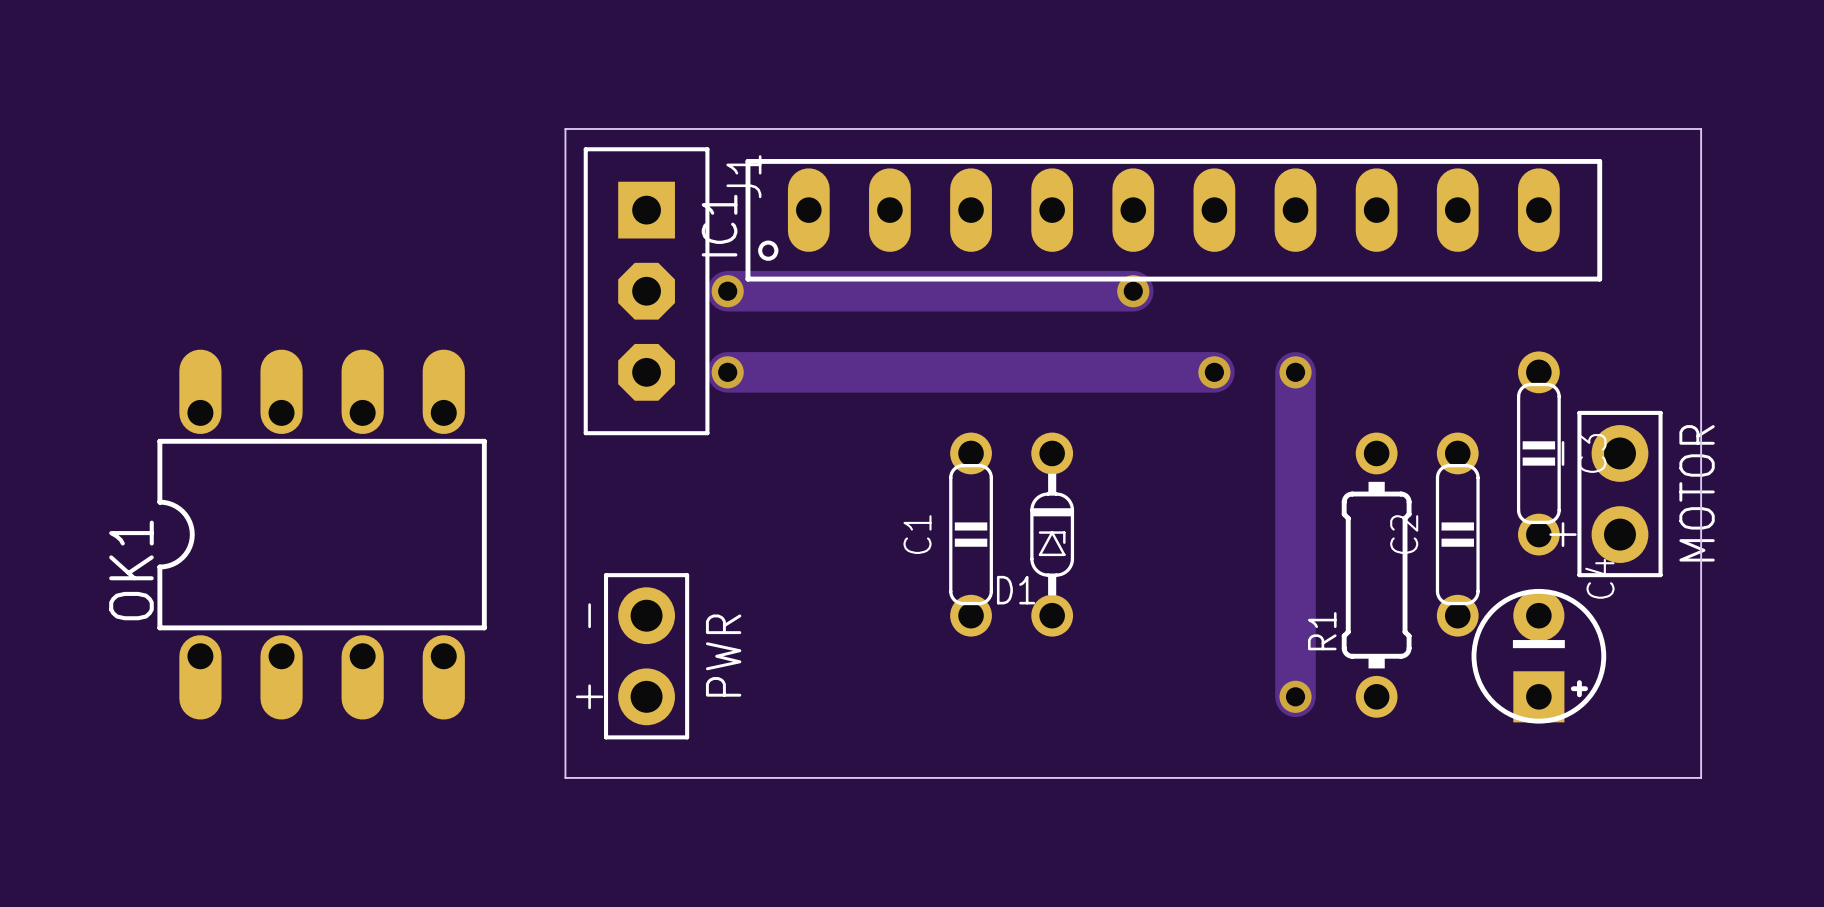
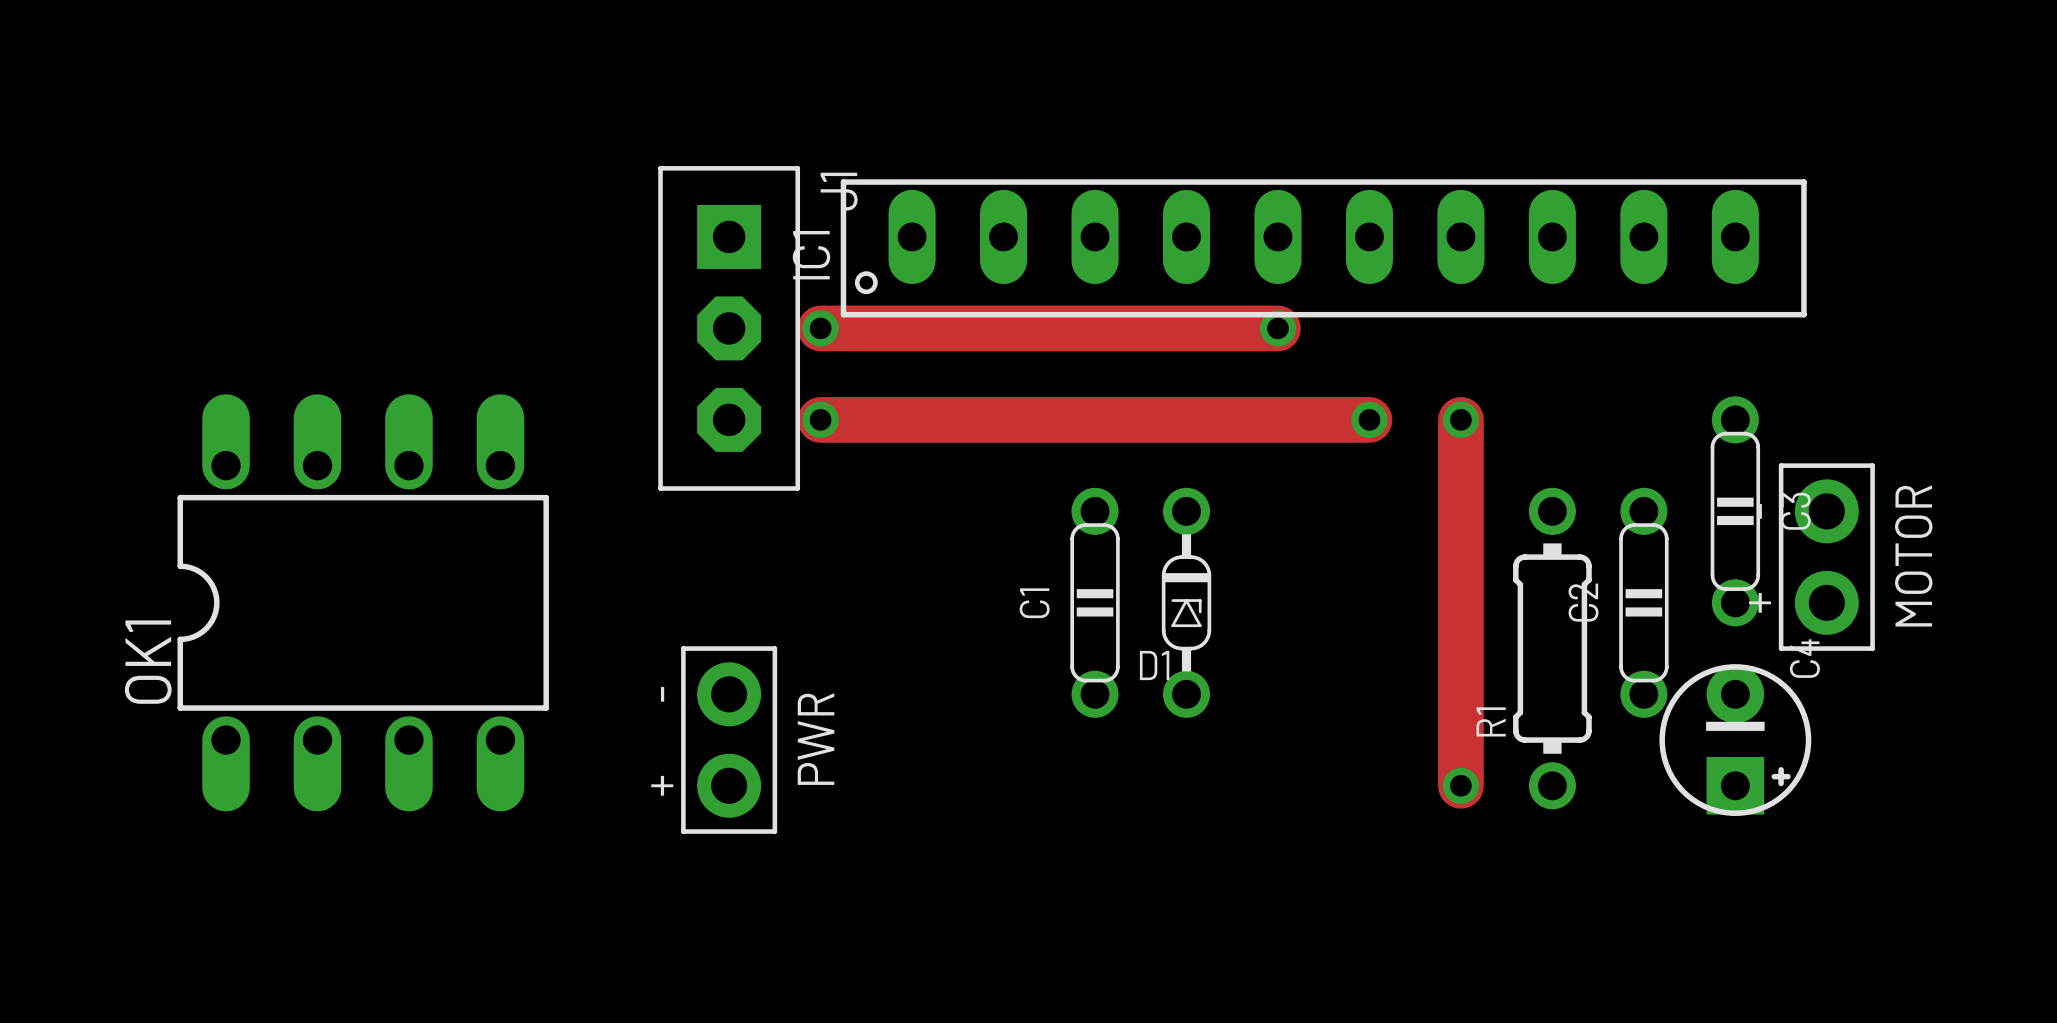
board edge: (565, 128) (1701, 128) (1701, 777) (565, 777) (565, 128) -> none

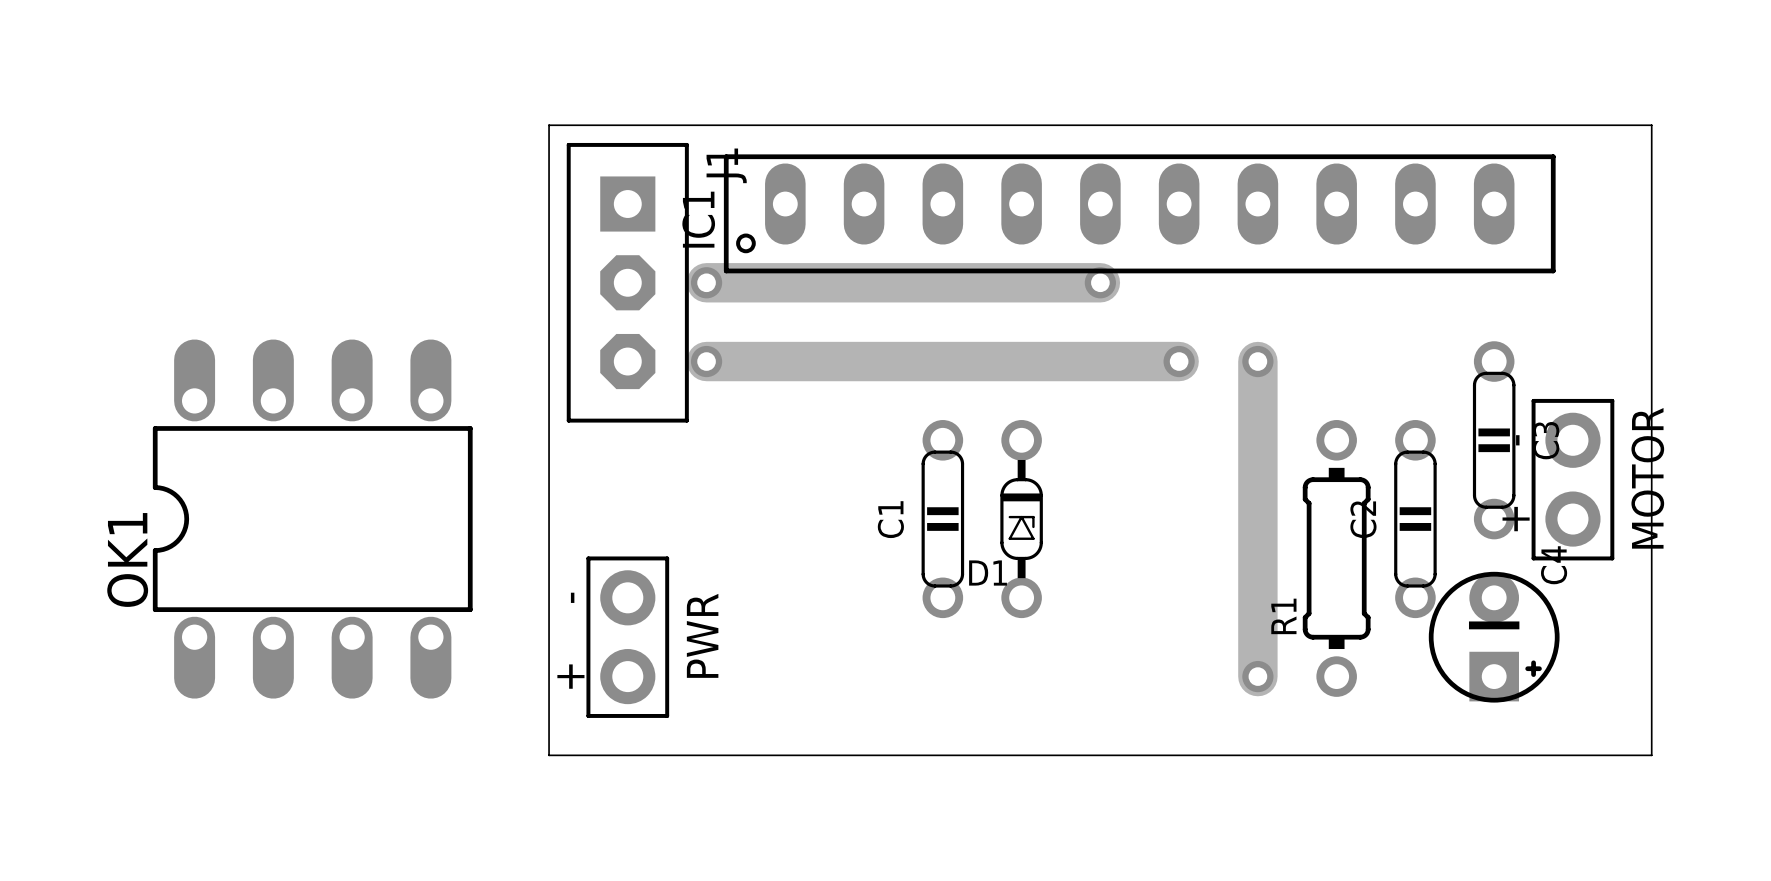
board edge: none -> (549, 125) (1651, 125) (1651, 755) (549, 755) (549, 125)

